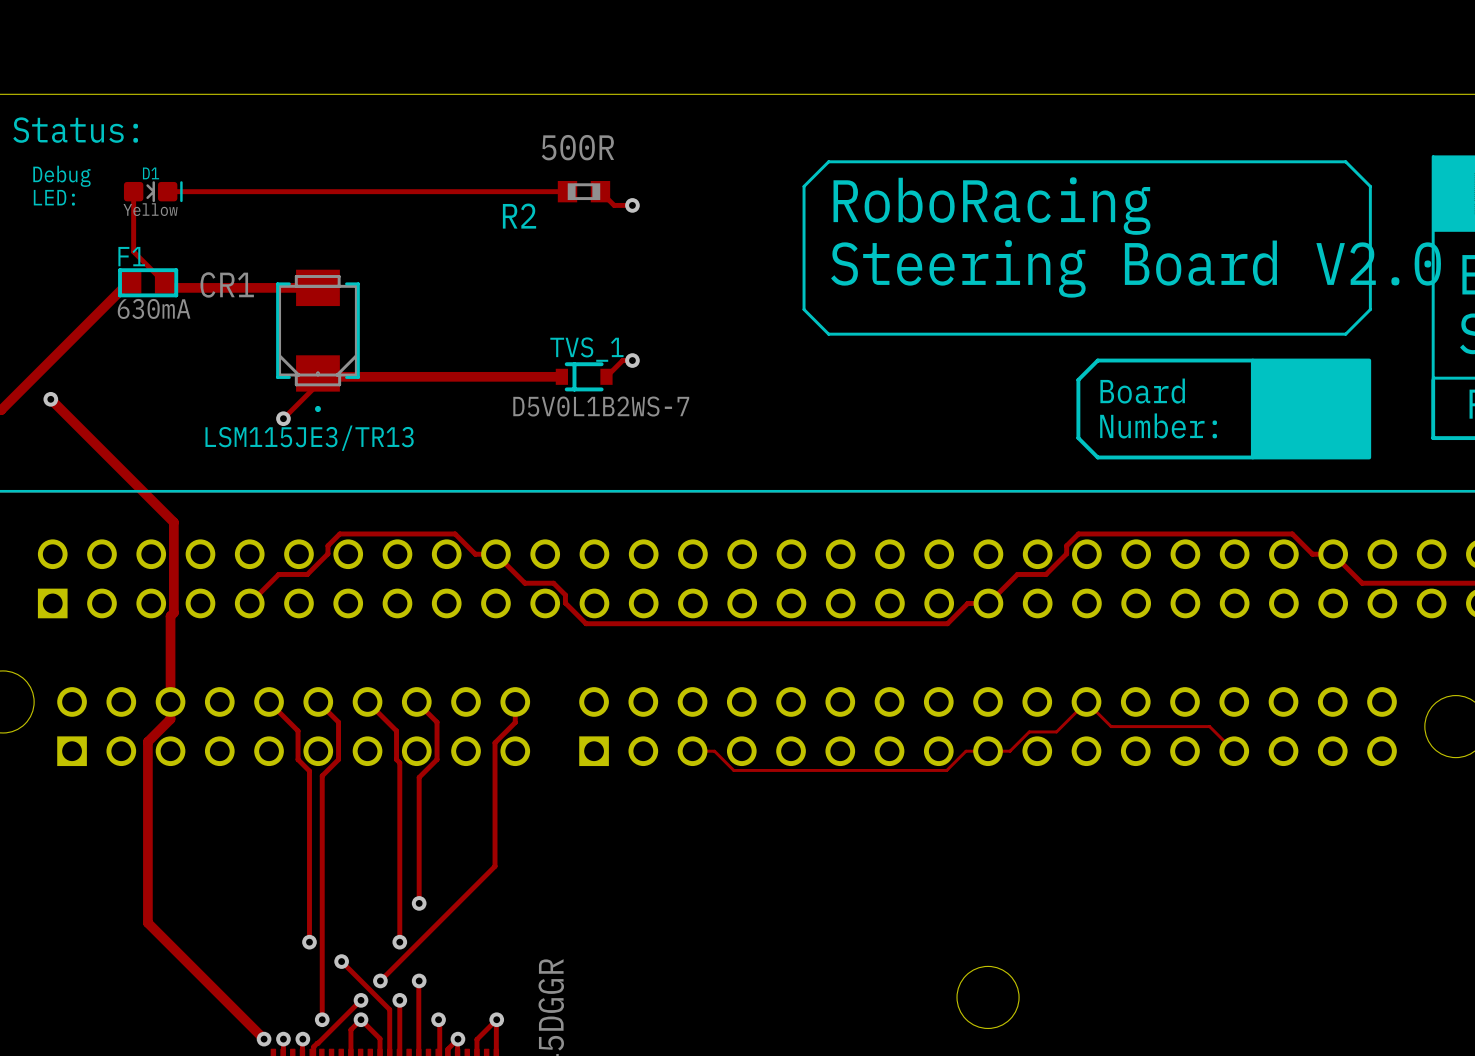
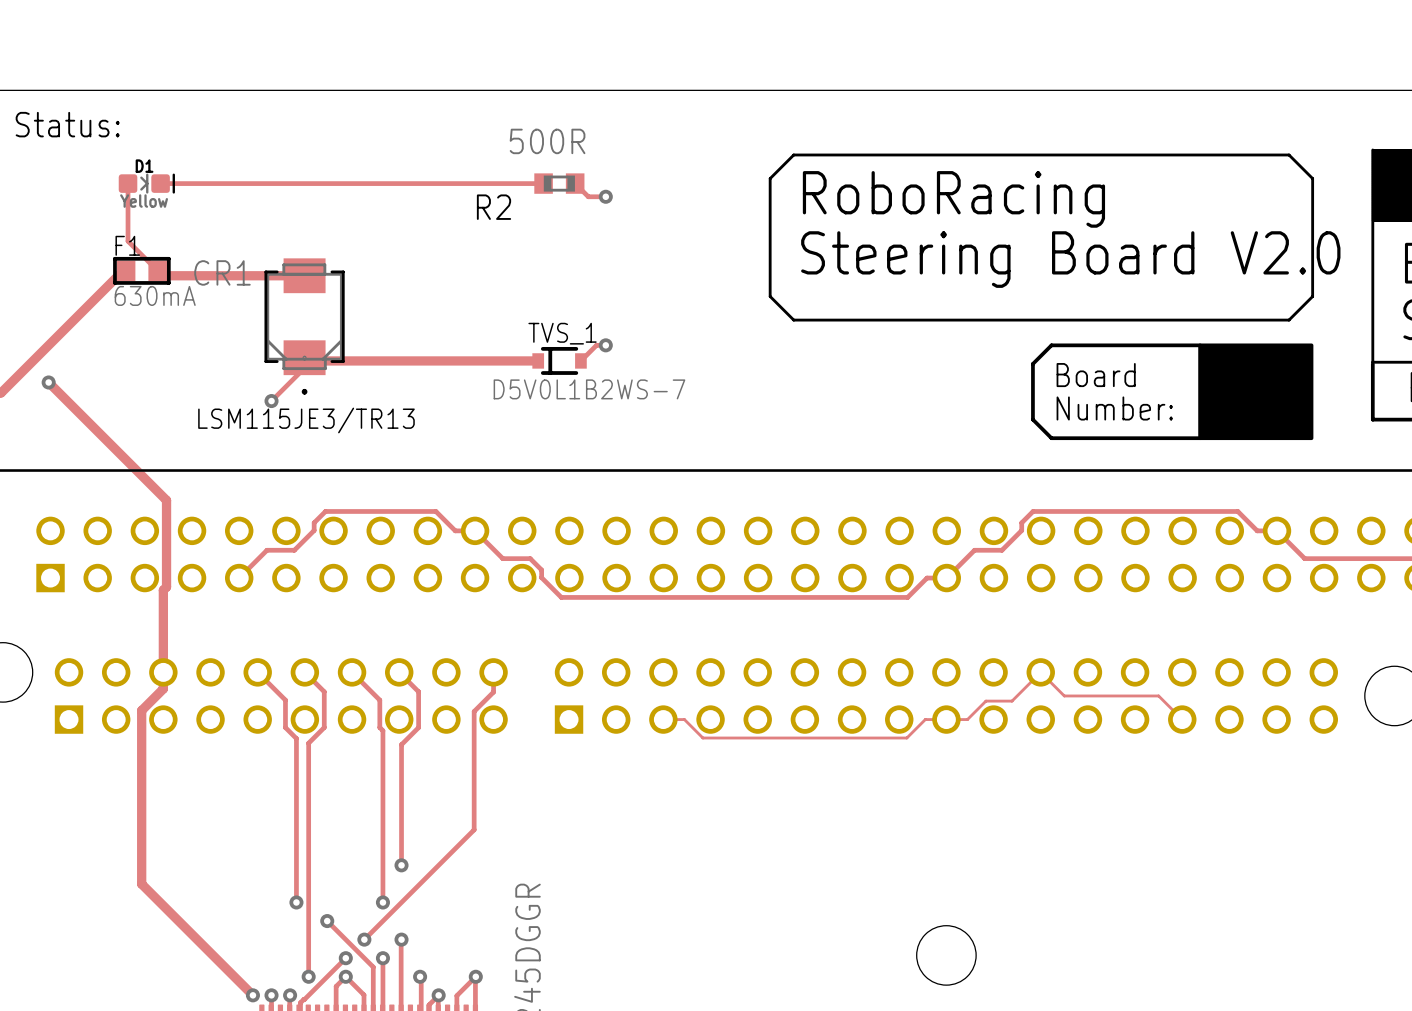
text: Debug (61, 176) -> none
text: LED: (54, 197) -> none

